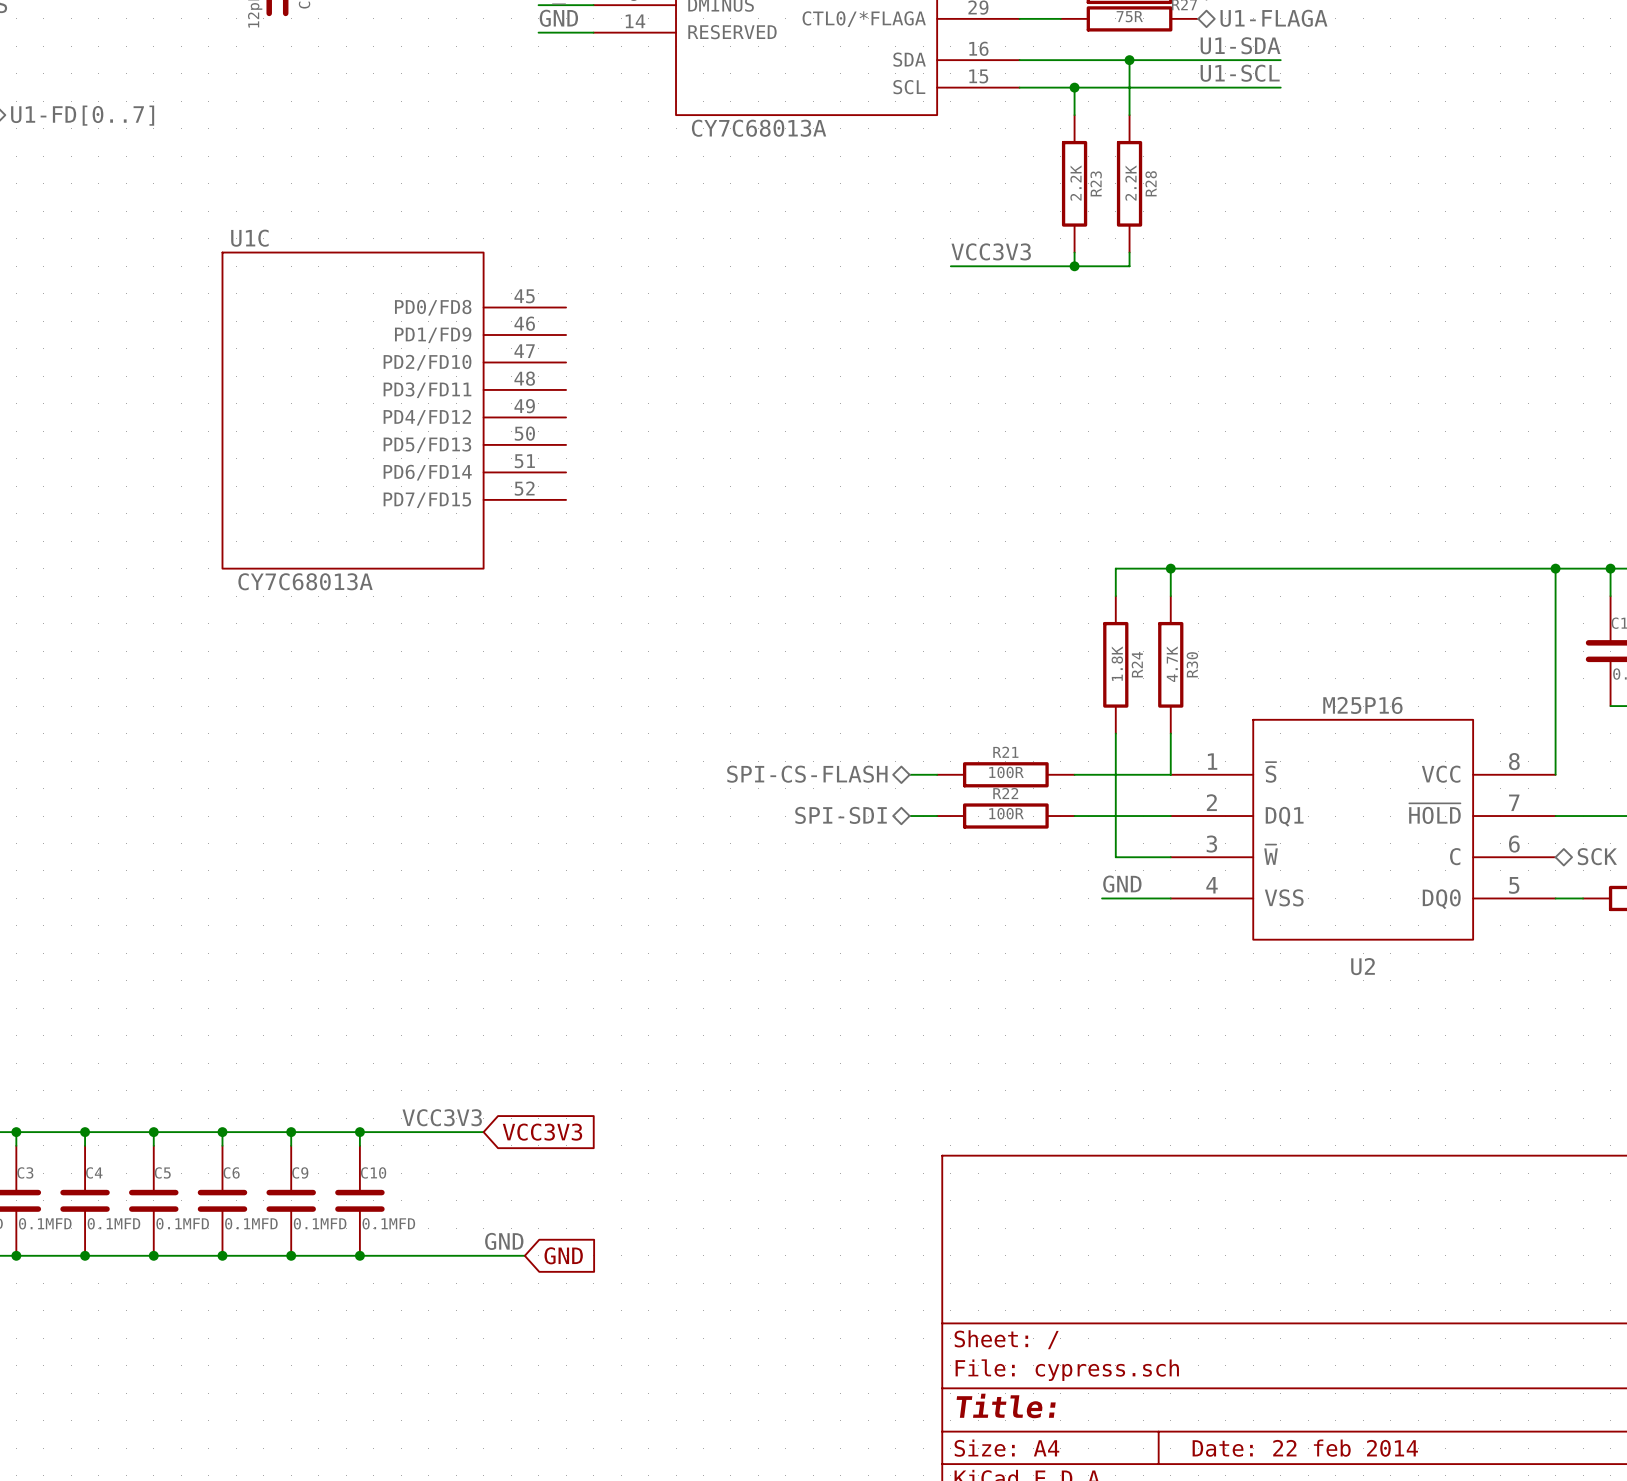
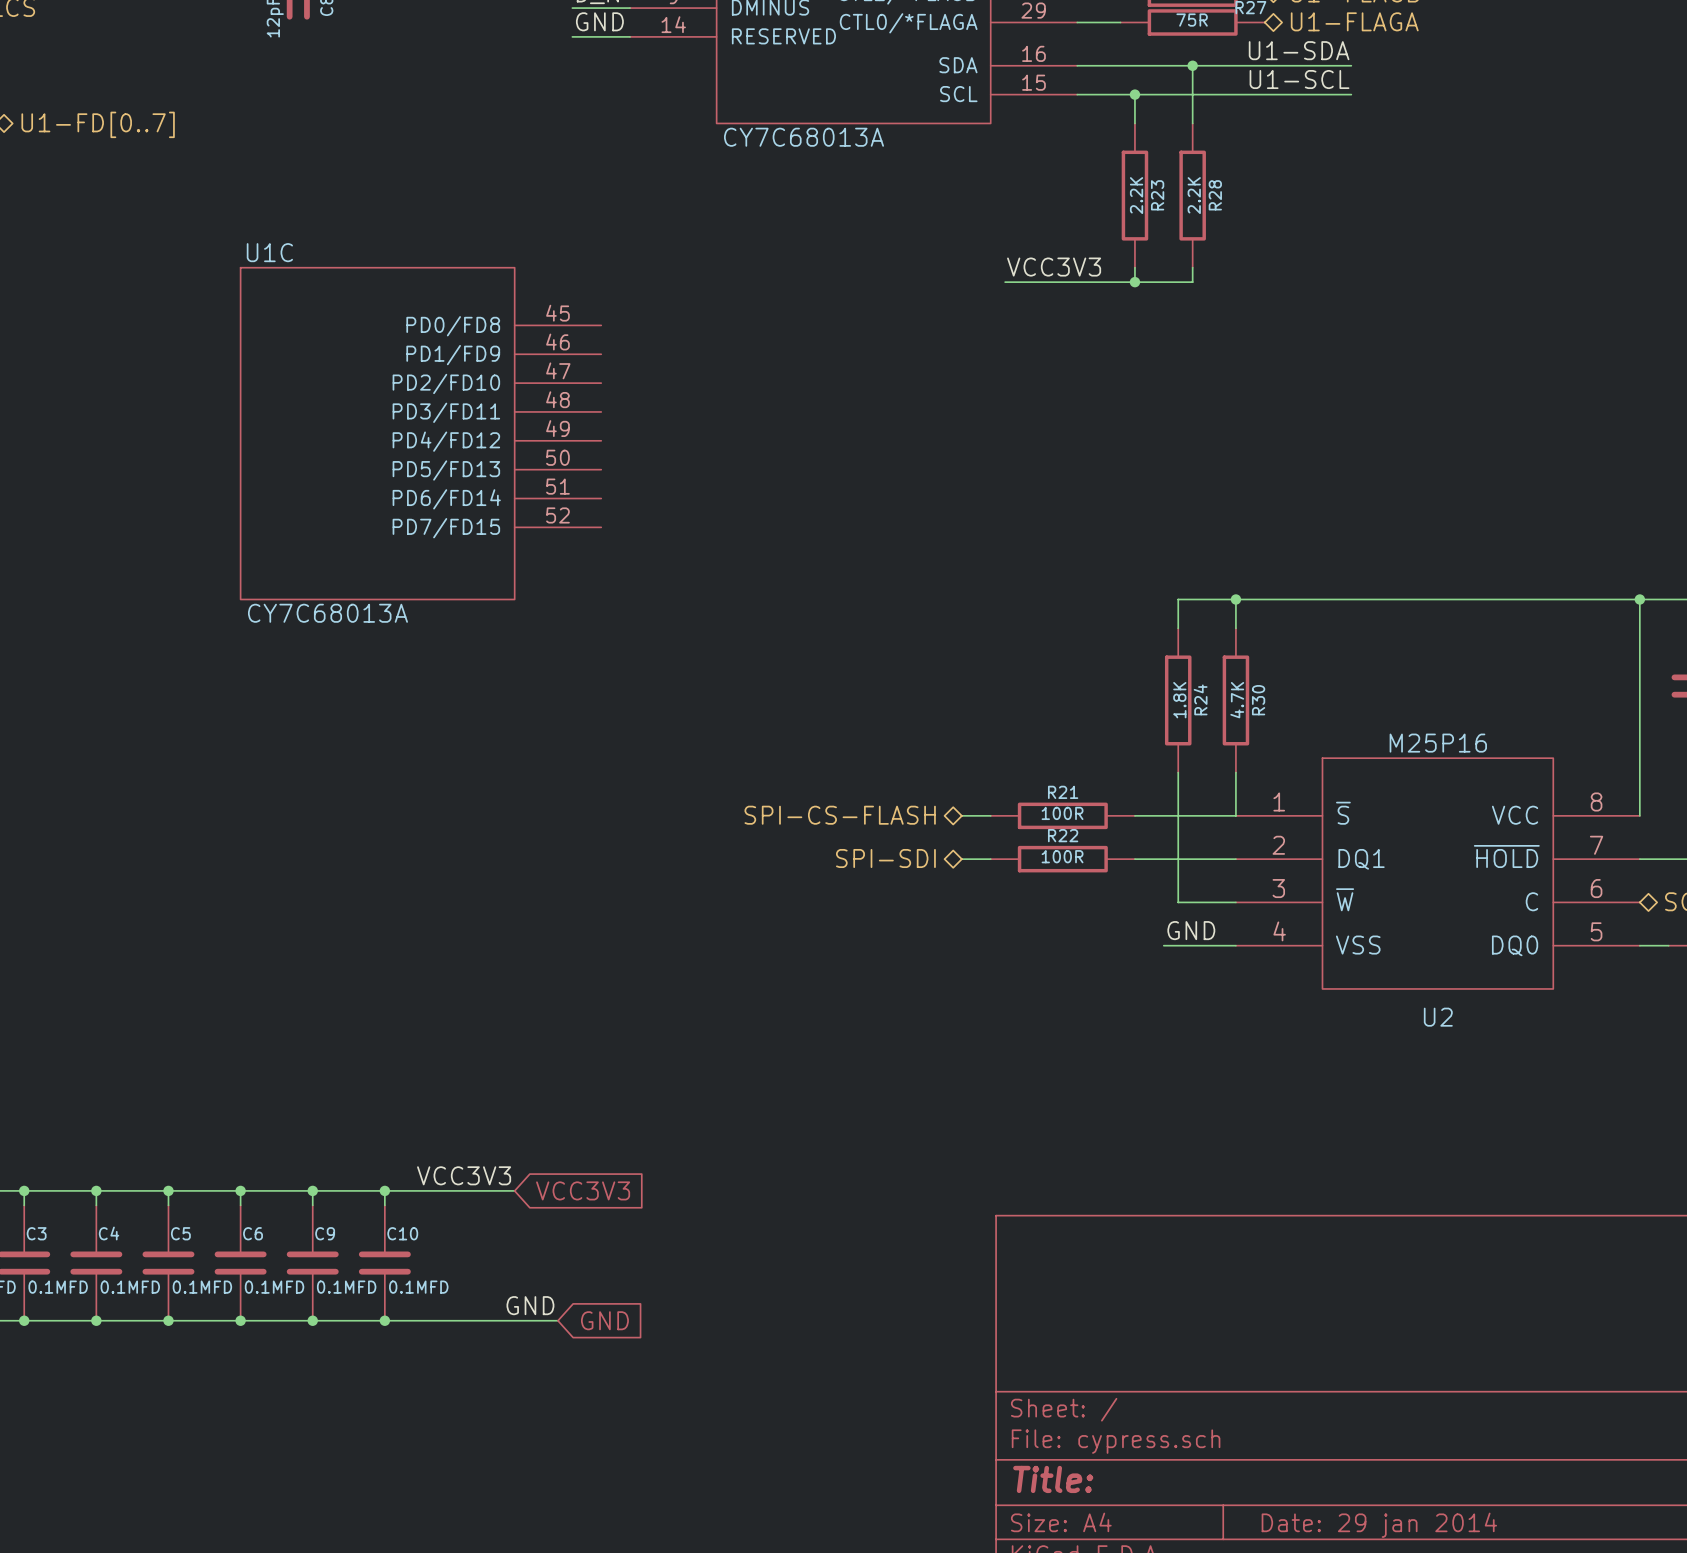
title block: Date: 22 feb 2014 (1305, 1448) -> Date: 29 jan 2014 (1379, 1525)

